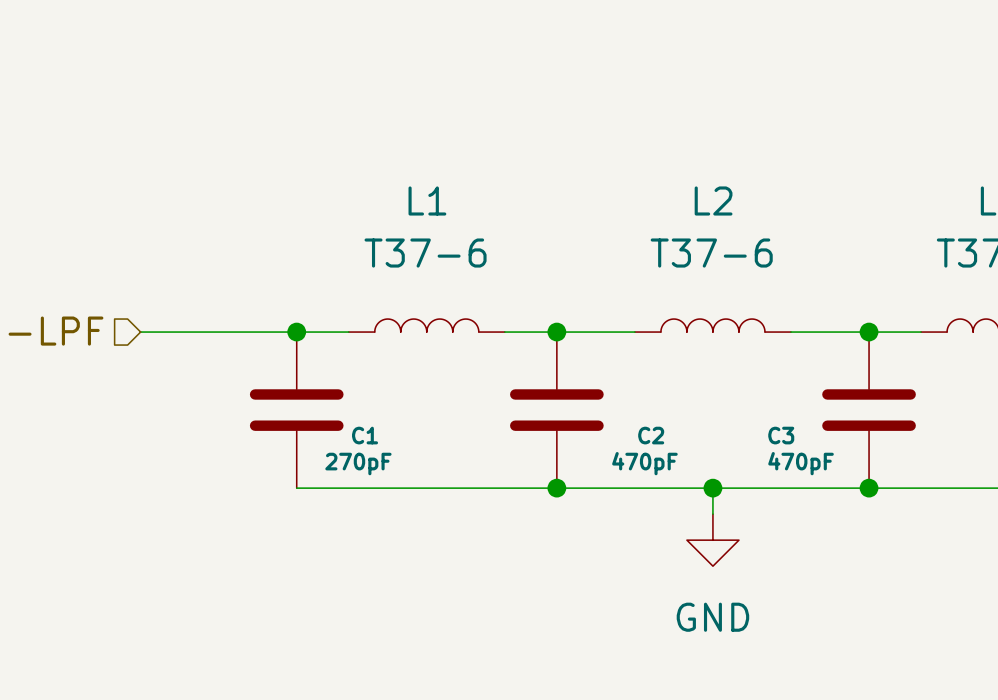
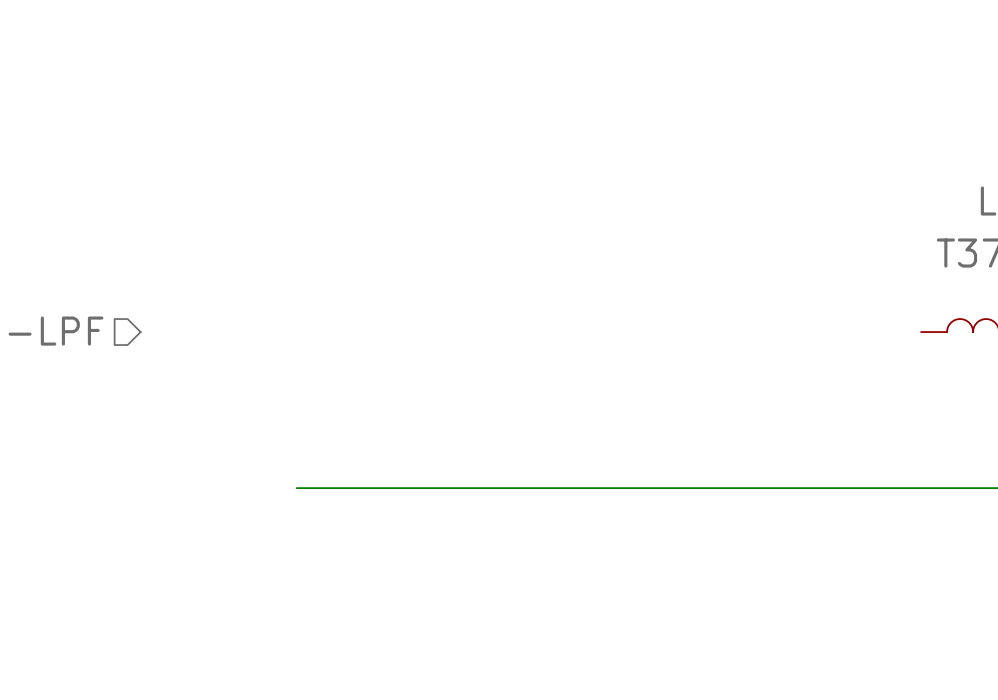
L1: T37-6 (426, 325) -> none
L2: T37-6 (712, 325) -> none
wire: (140, 332) (348, 332) -> none
junction: (296, 332) -> none
wire: (504, 332) (634, 332) -> none
junction: (556, 332) -> none
wire: (790, 332) (921, 332) -> none
junction: (869, 332) -> none
C1: 270pF (296, 410) -> none
C2: 470pF (556, 410) -> none
C3: 470pF (869, 410) -> none
junction: (556, 488) -> none
wire: (712, 488) (712, 514) -> none
junction: (712, 488) -> none
junction: (869, 488) -> none
power symbol: GND (712, 540) -> none

